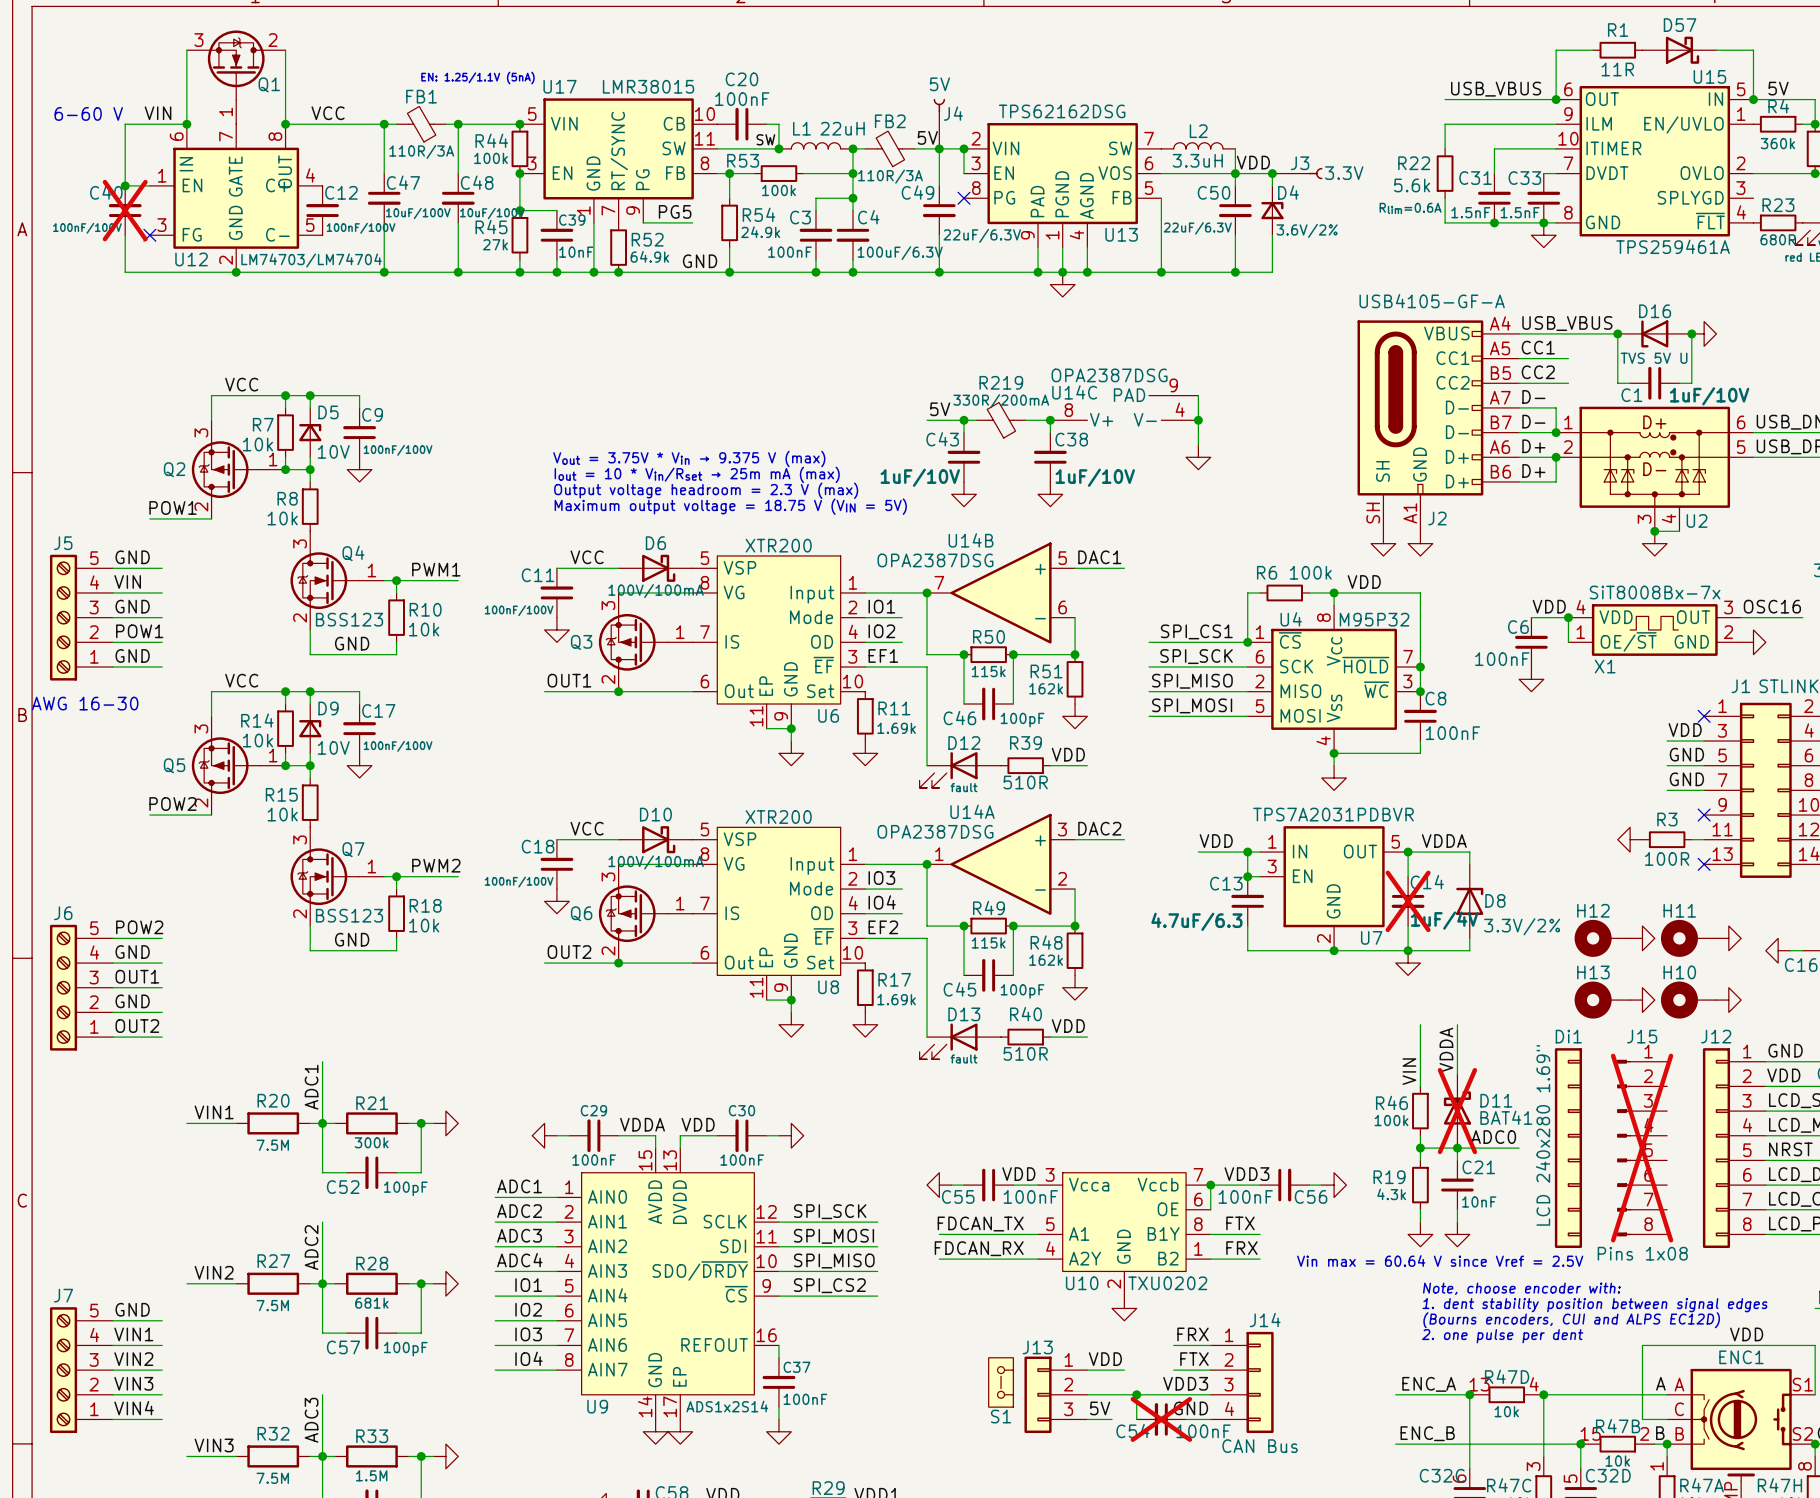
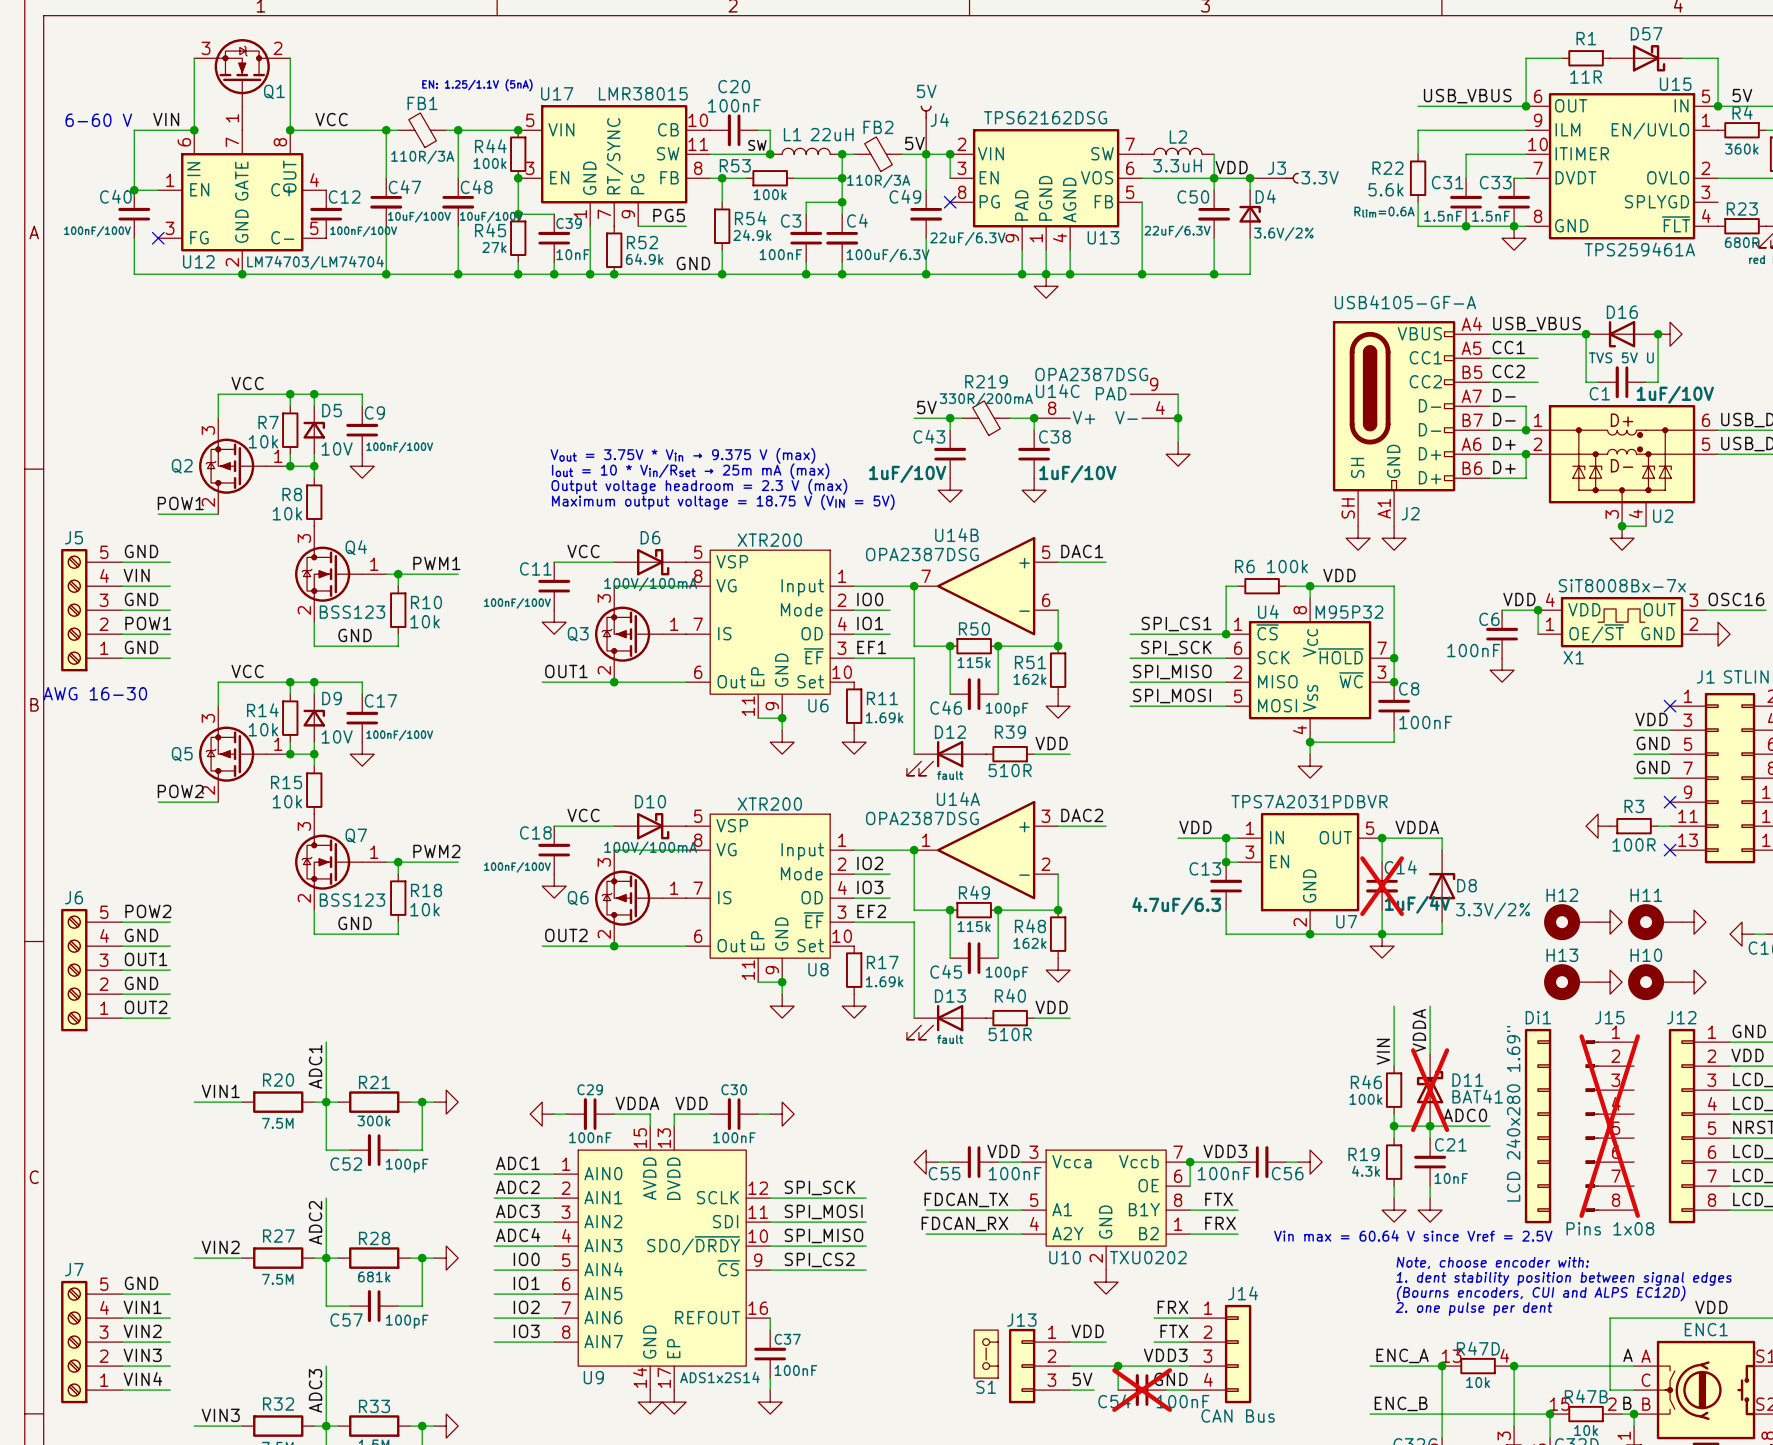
C40 do-not-place cross: (125, 210) -> none
label: IO1 (881, 606) -> IO0 (870, 599)
label: IO2 (881, 631) -> IO1 (870, 623)
label: IO3 (881, 878) -> IO2 (870, 863)
label: IO4 (882, 902) -> IO3 (870, 887)
label: IO1 (528, 1285) -> IO0 (526, 1259)
label: IO2 (528, 1309) -> IO1 (526, 1283)
label: IO3 (528, 1334) -> IO2 (526, 1307)
label: IO4 (528, 1358) -> IO3 (526, 1331)

